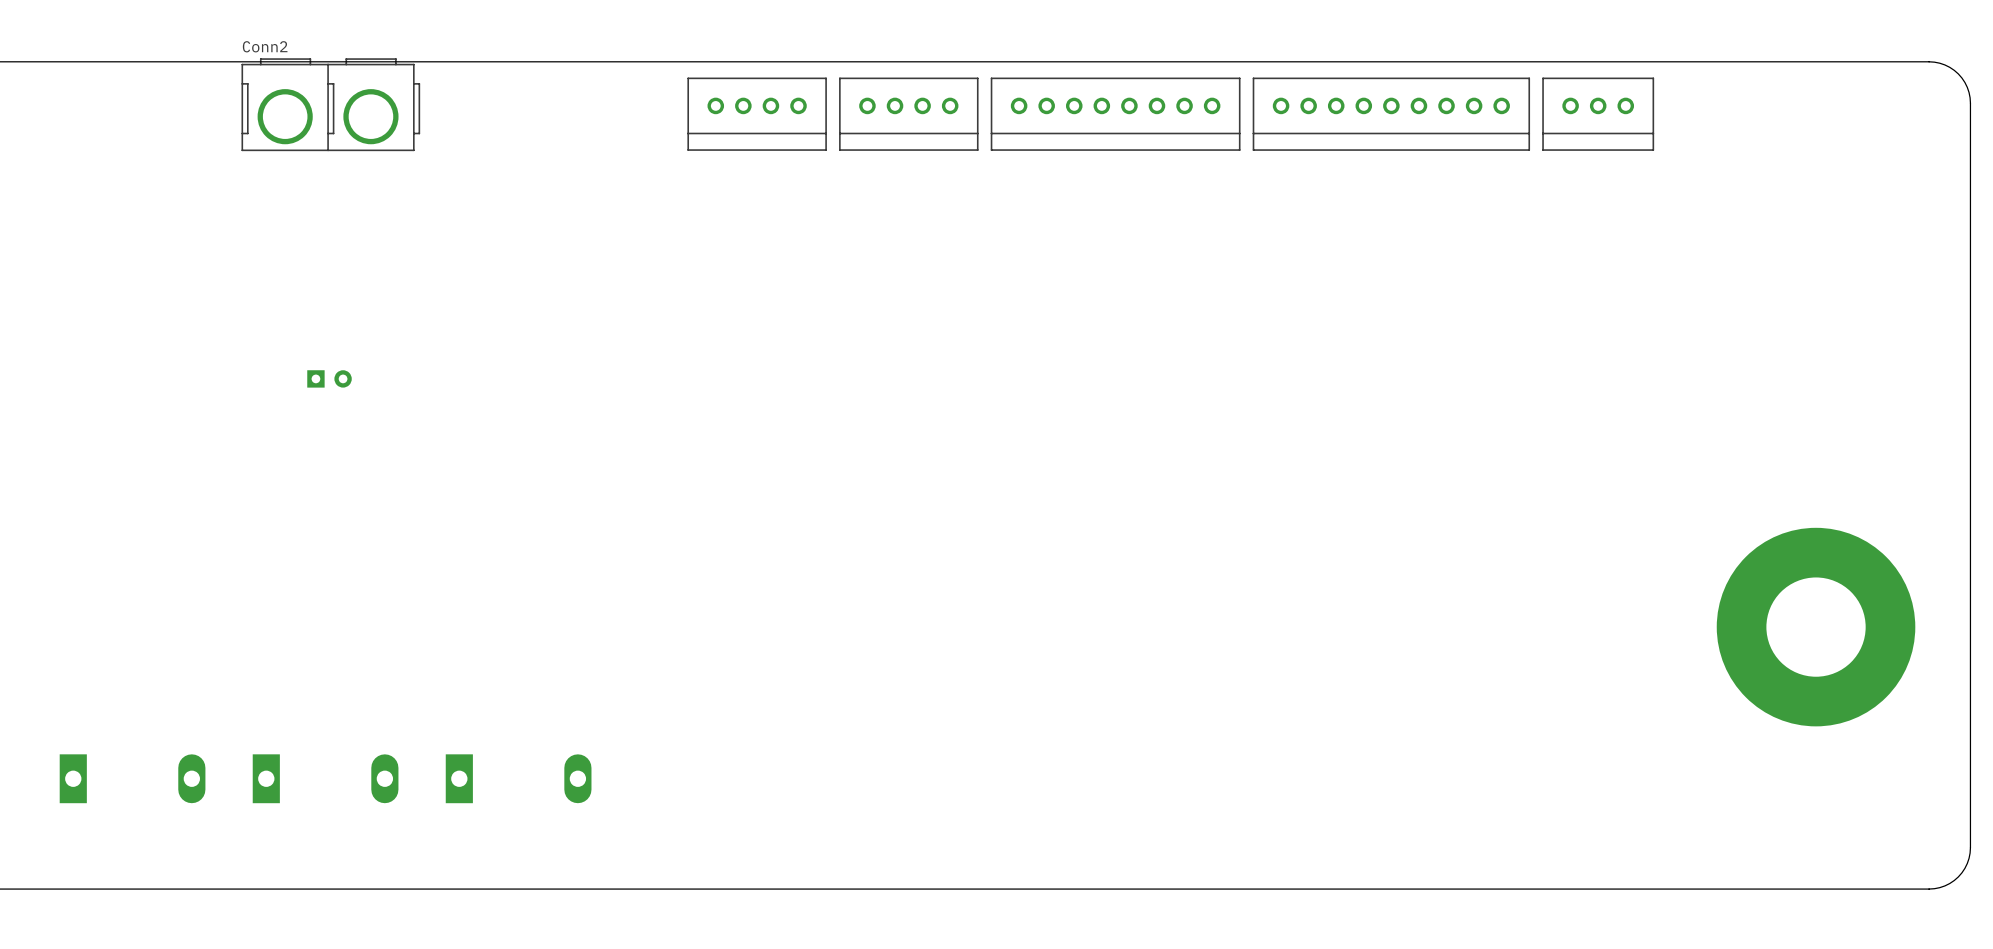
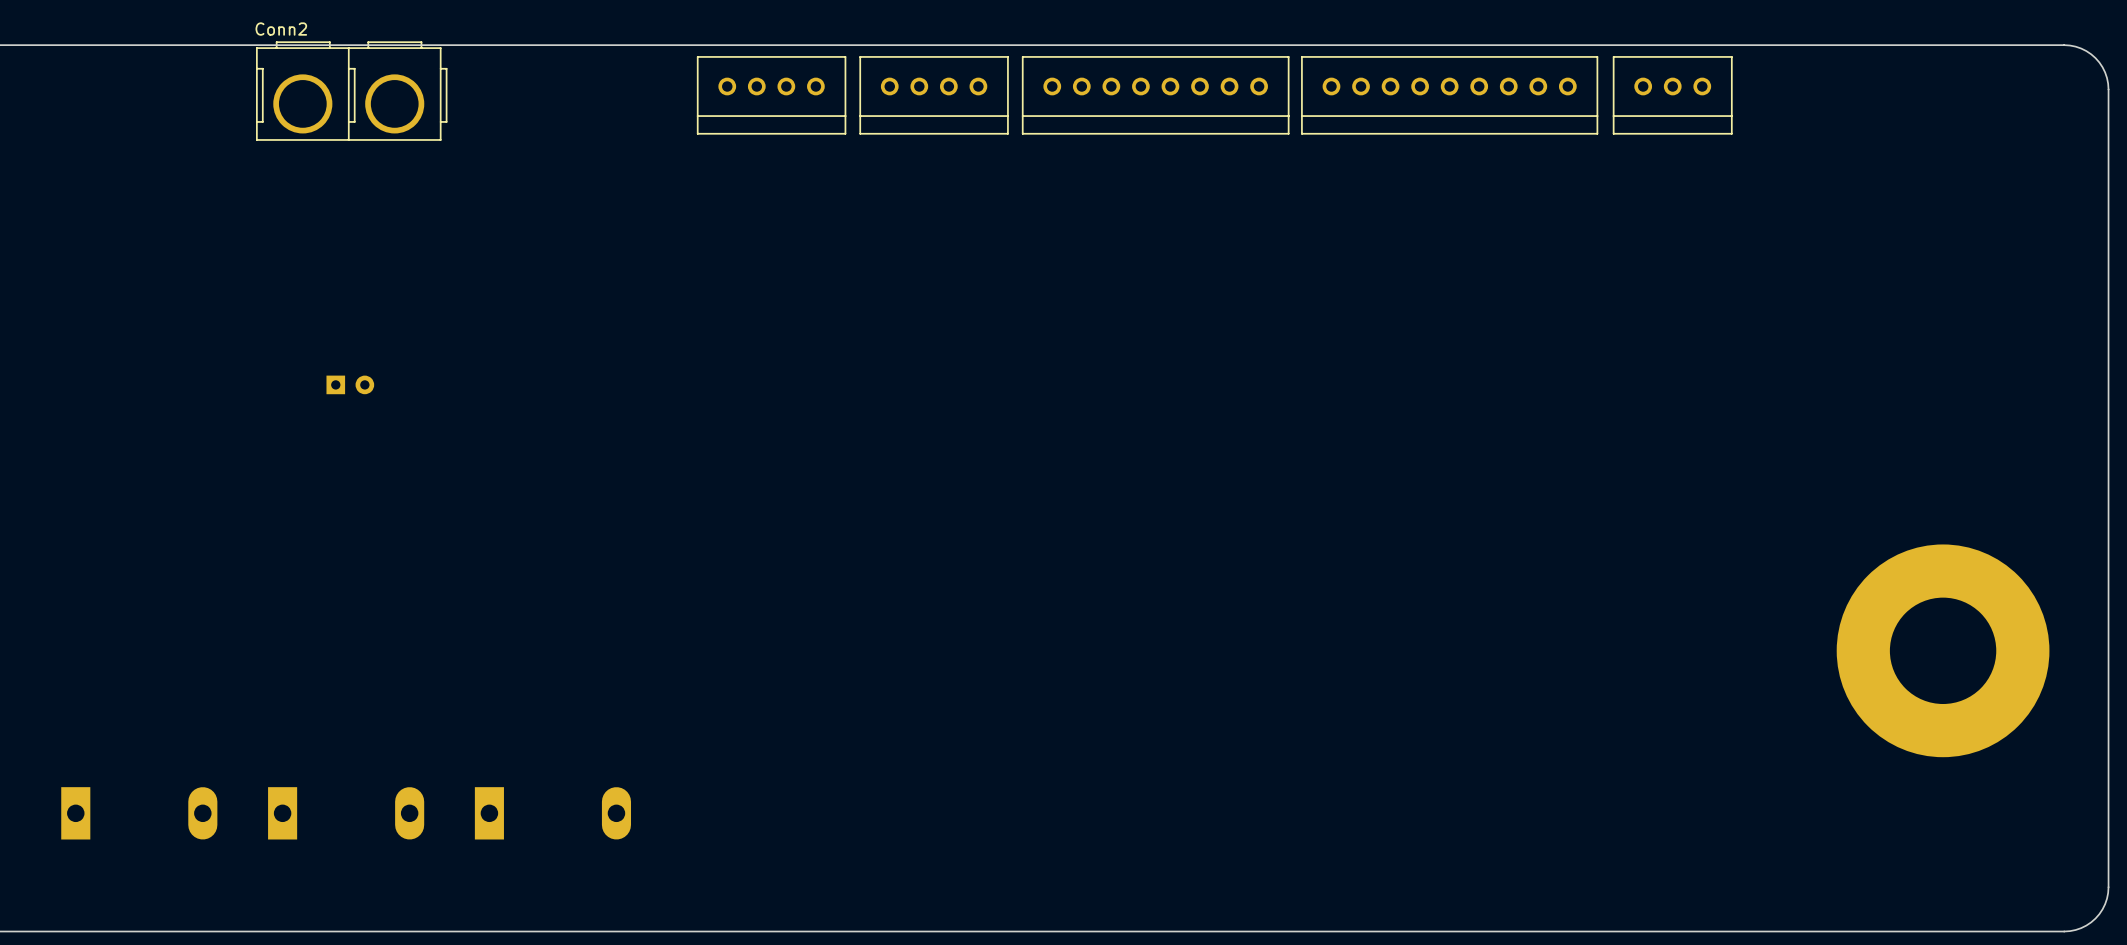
part position: (757, 114) -> (771, 95)
part position: (908, 114) -> (934, 95)
part position: (1115, 114) -> (1155, 95)
part position: (1391, 114) -> (1449, 95)
part position: (1598, 114) -> (1672, 95)

